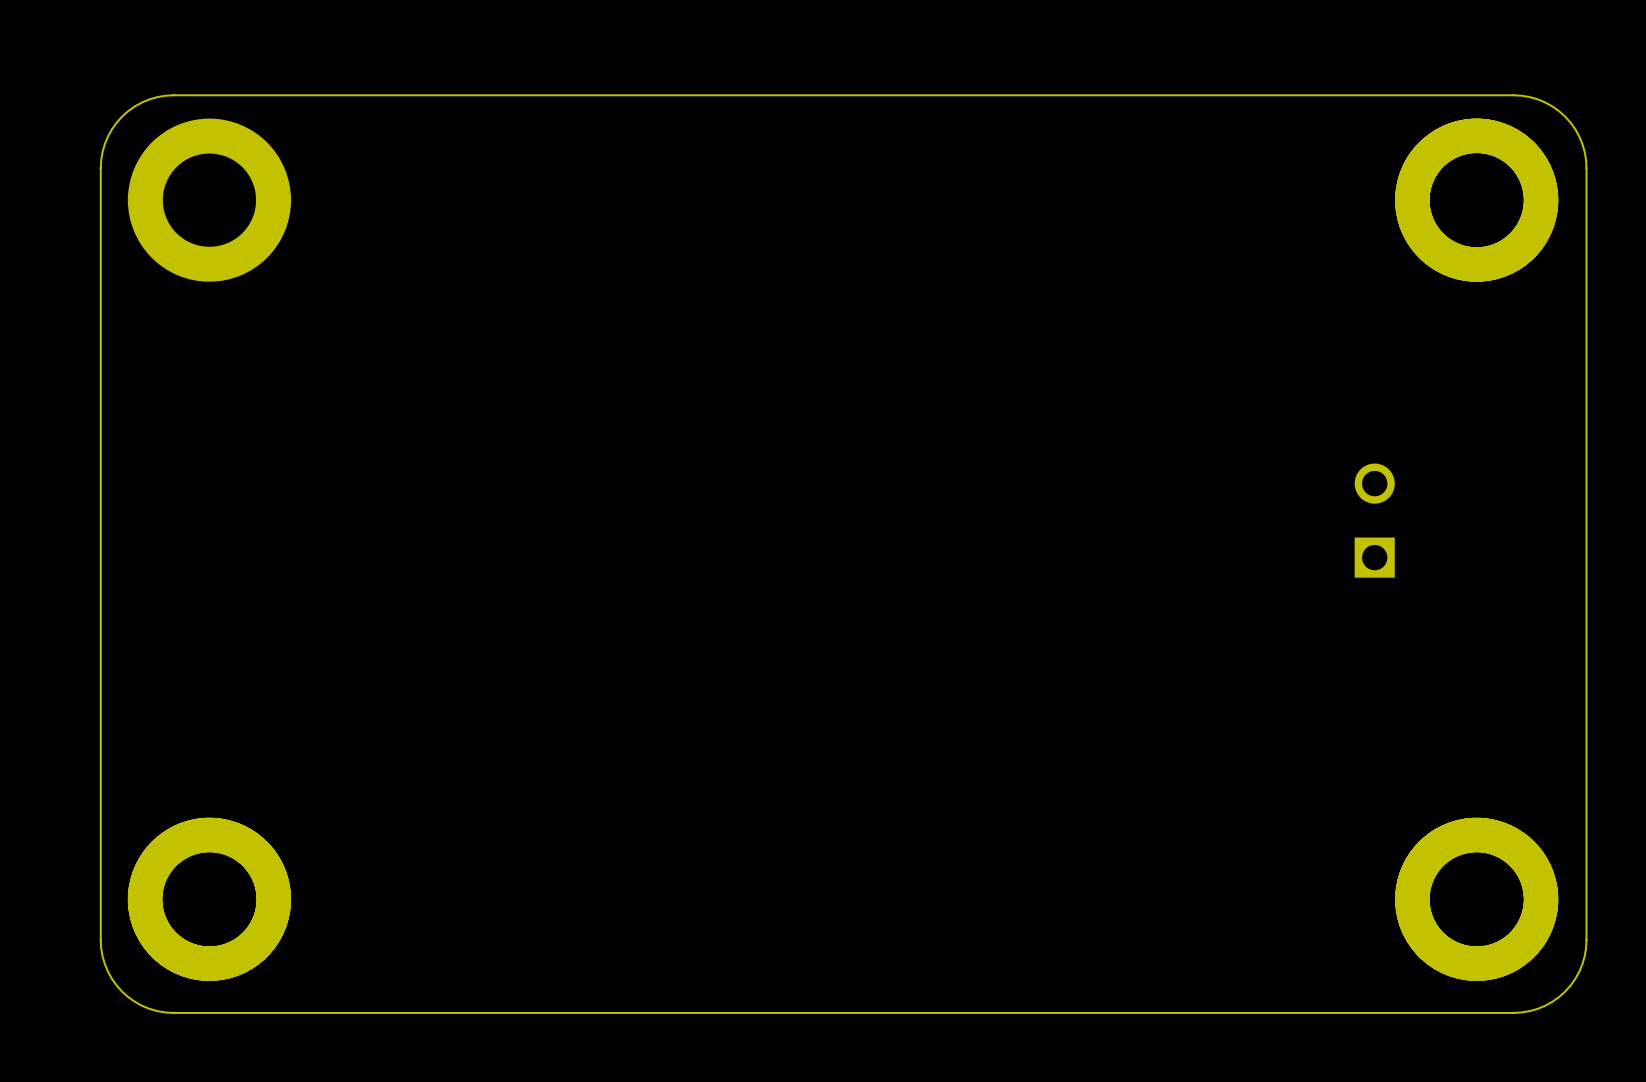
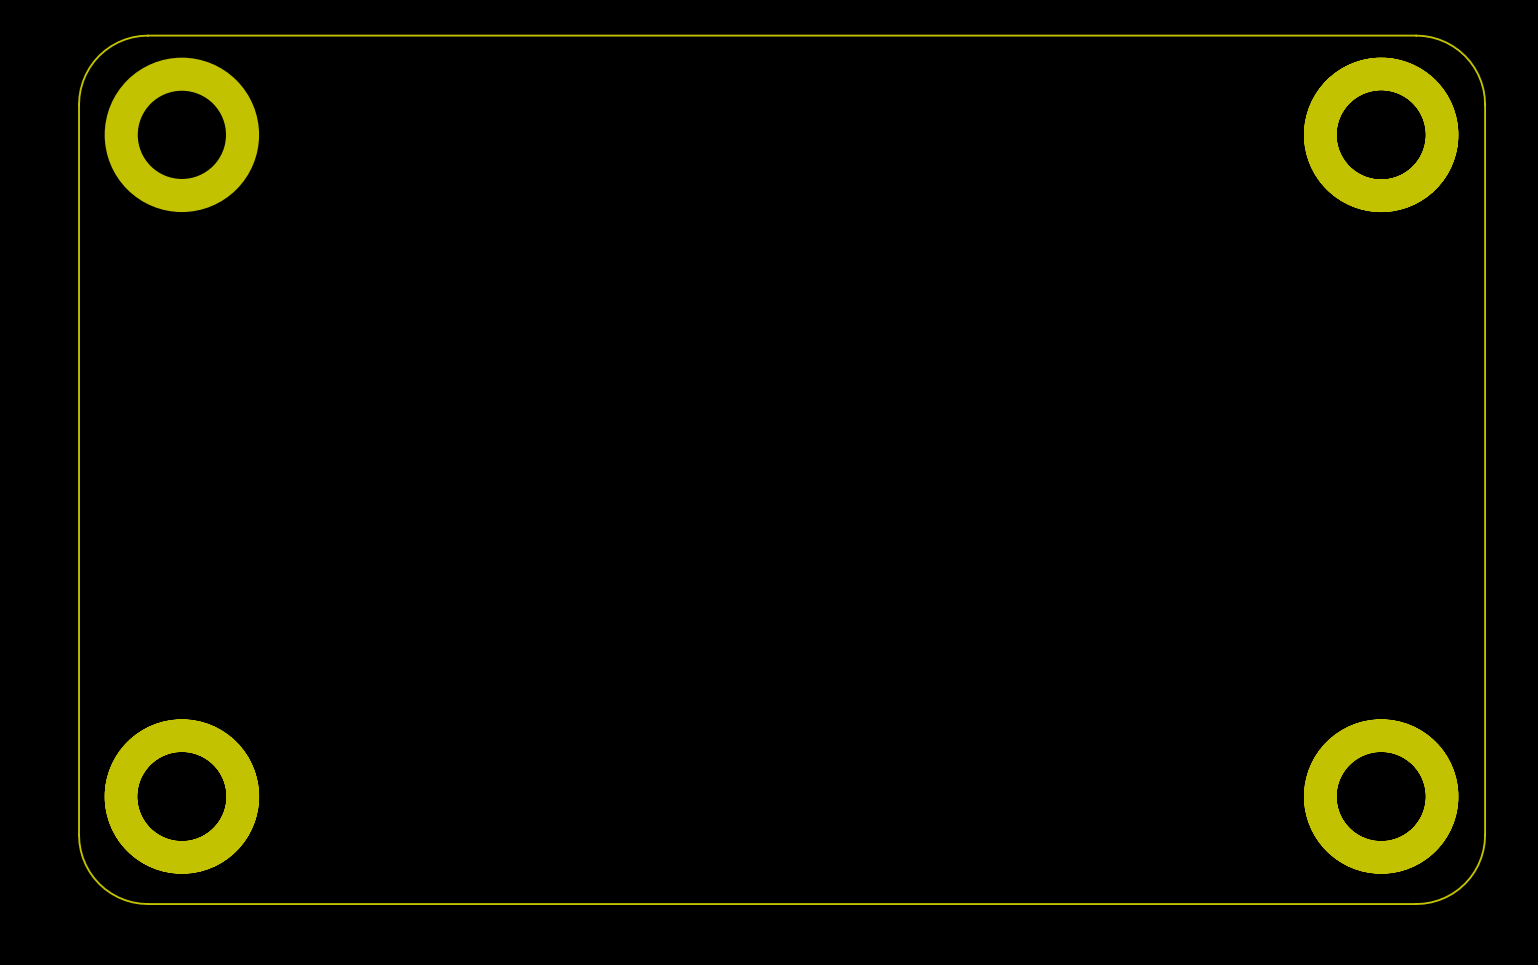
part: (1374, 520) -> none

